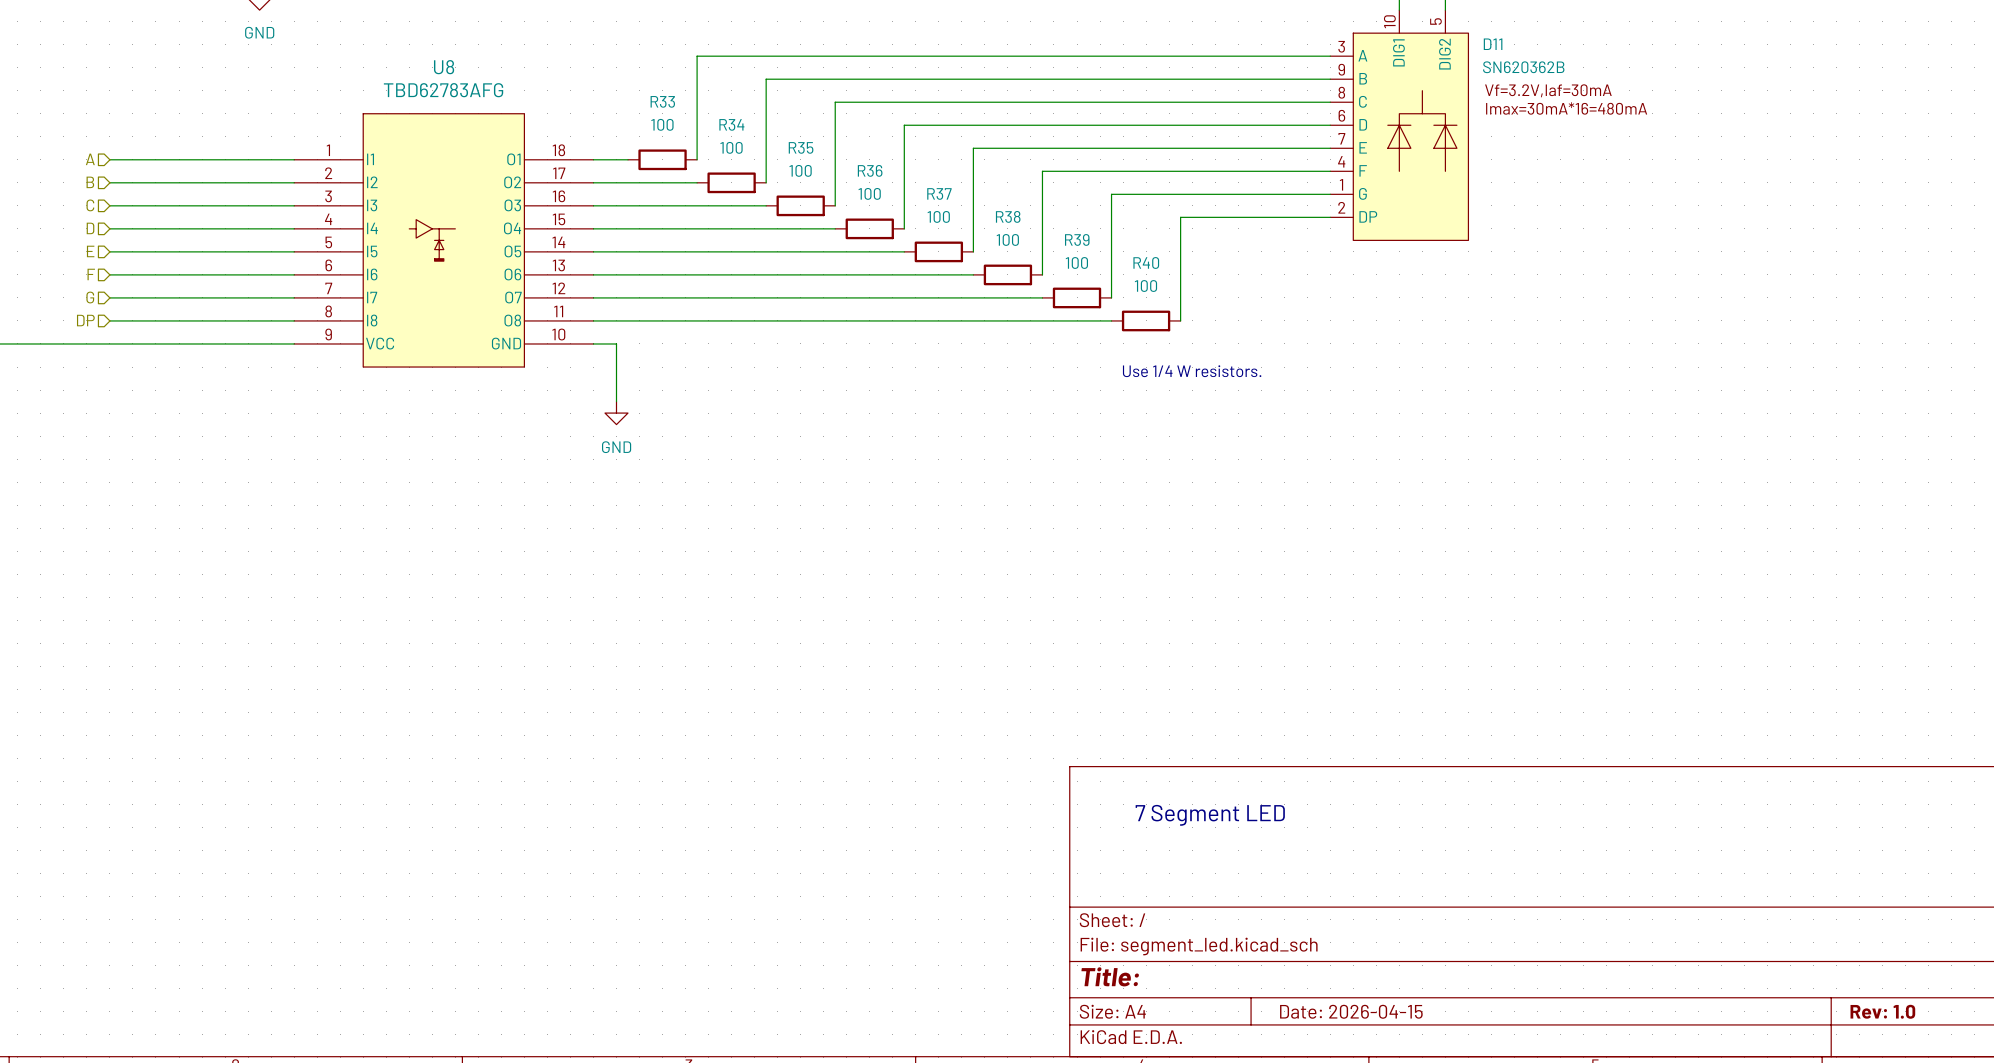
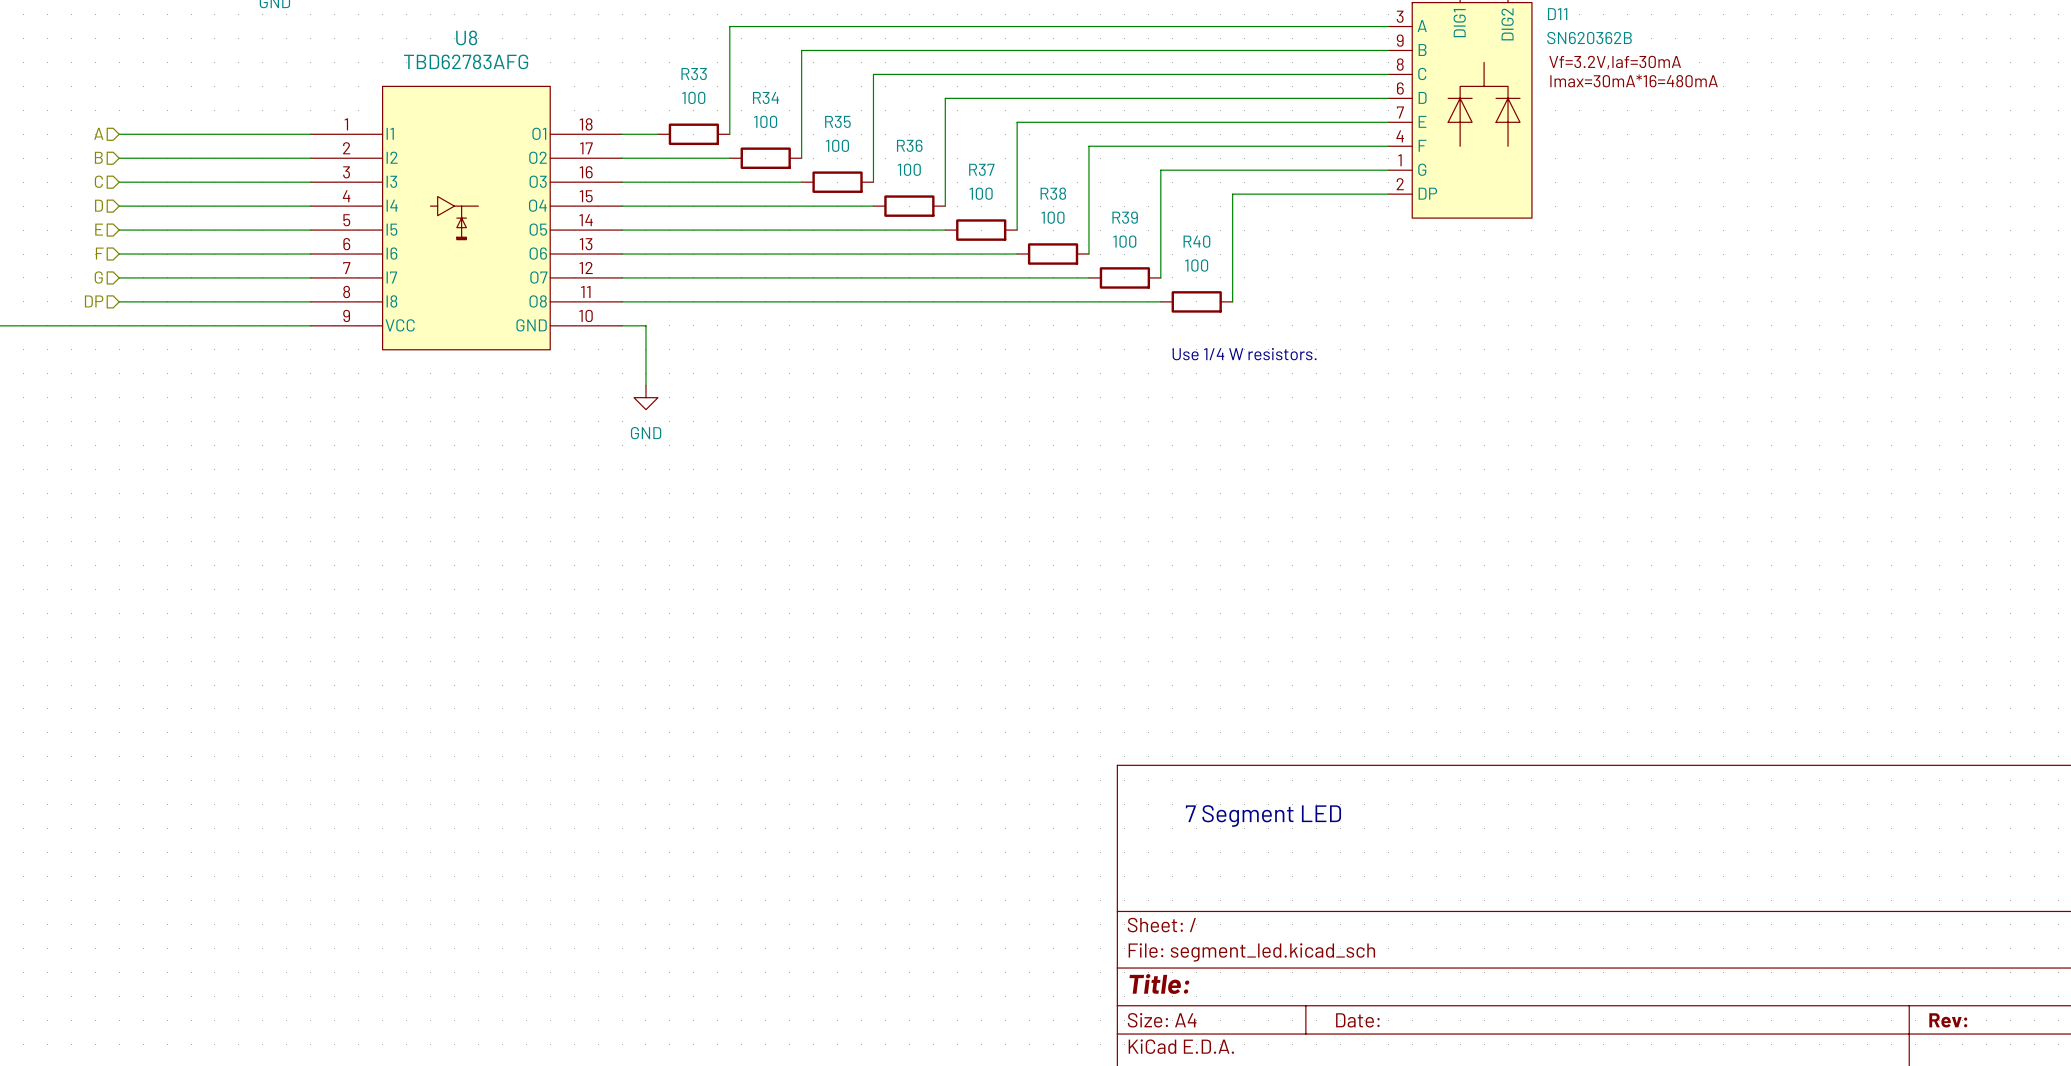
title block: Date: 2026-04-15 (1351, 1011) -> Date: (1357, 1020)
title block: Rev: 1.0 (1882, 1011) -> Rev: (1948, 1020)

